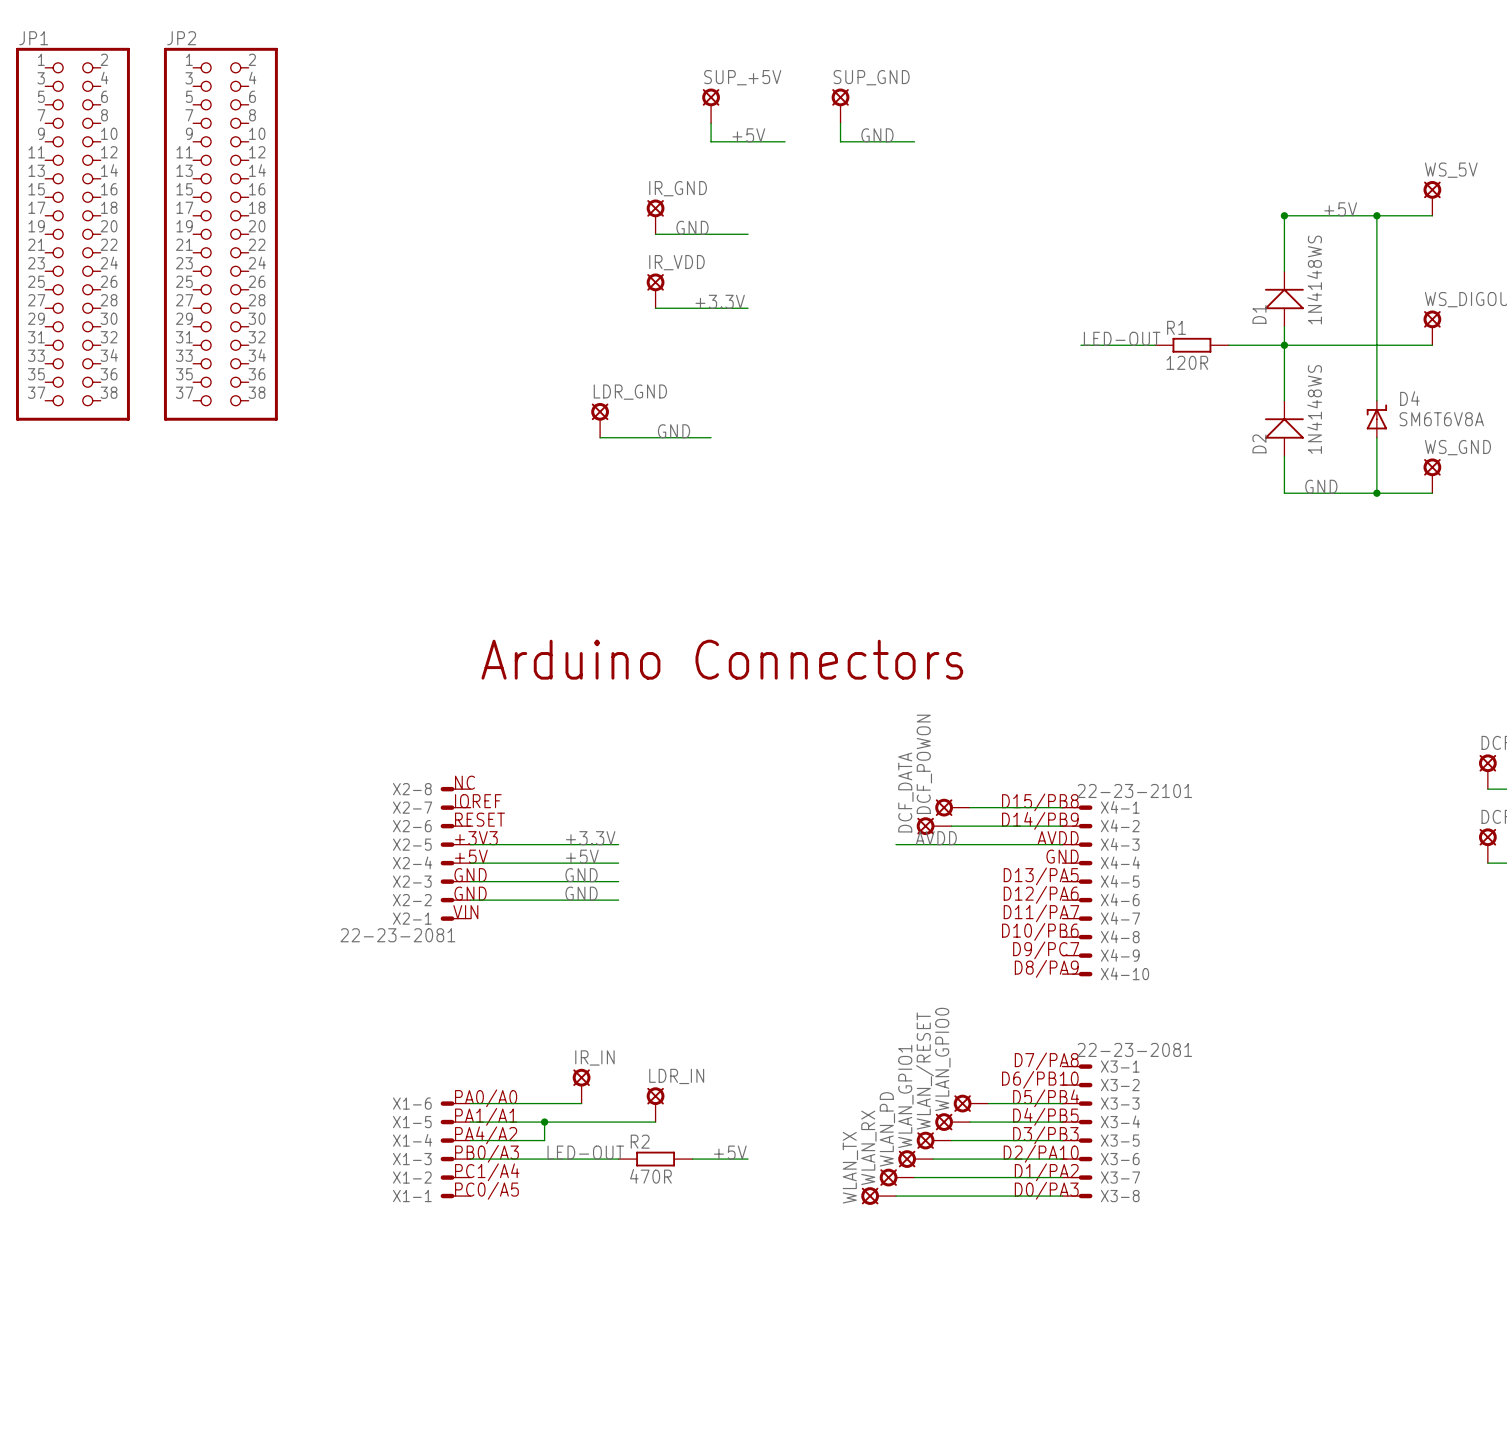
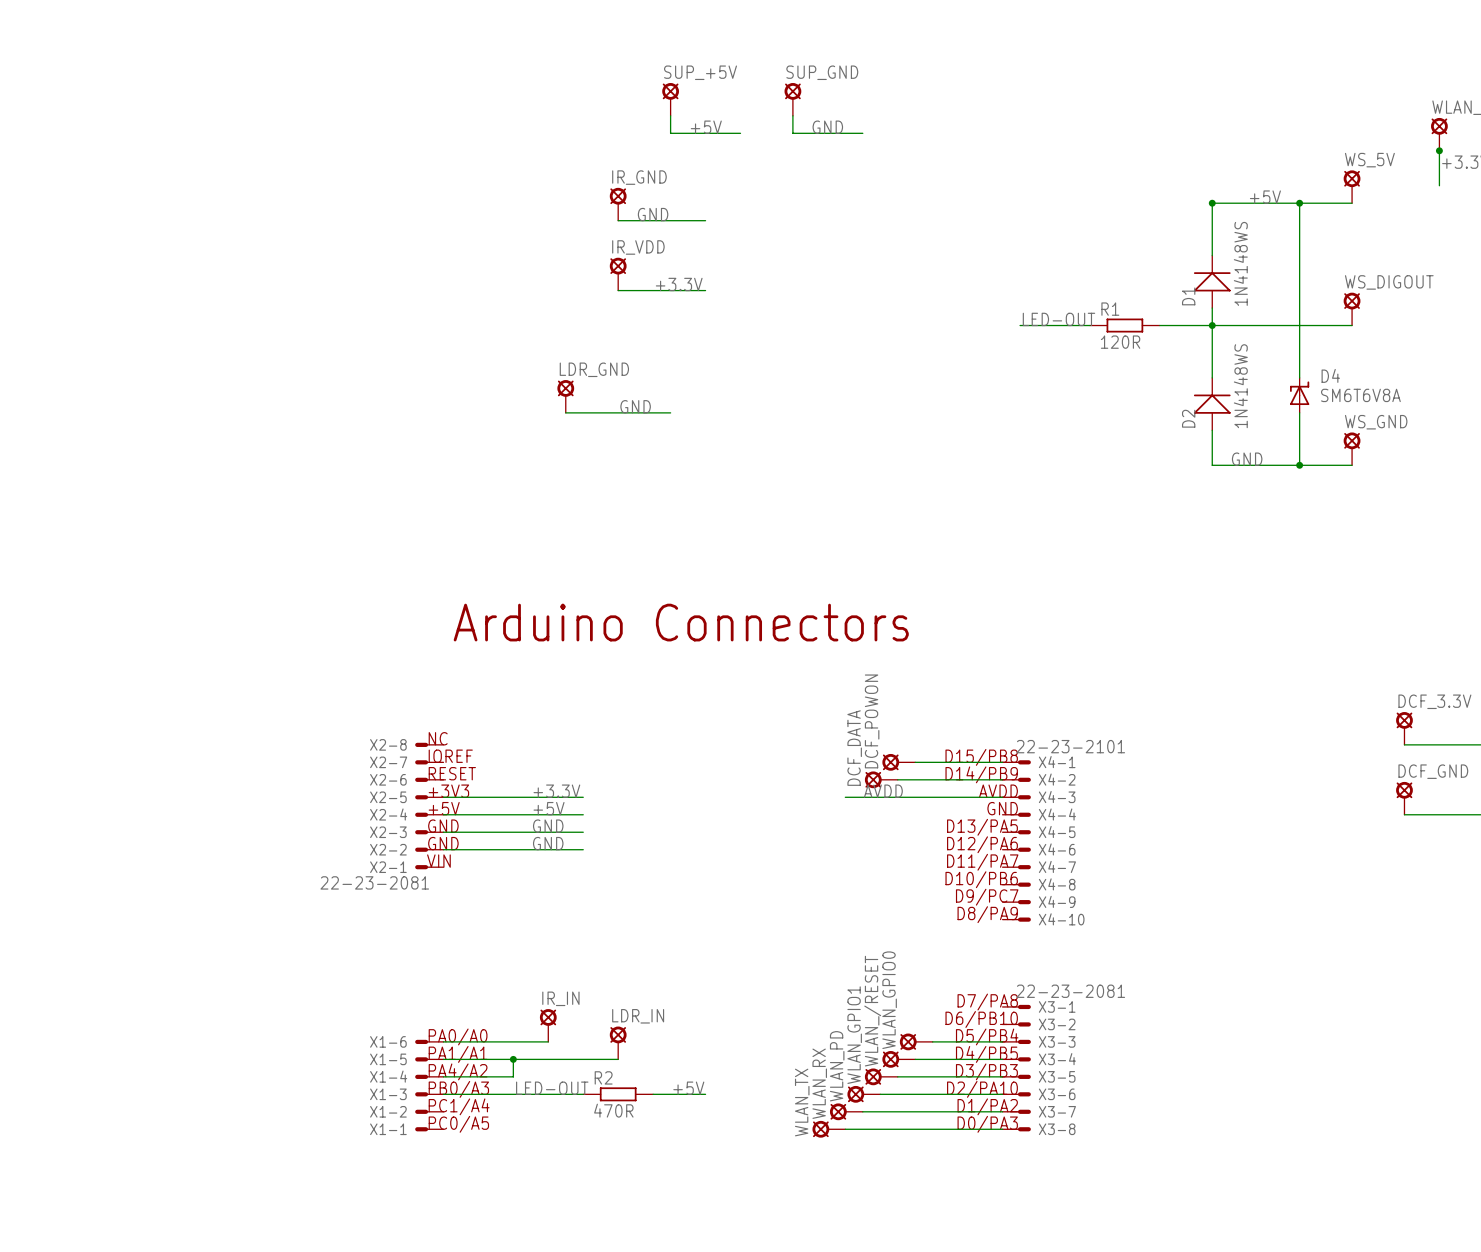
JP1: (72, 234) -> none
JP2: (220, 234) -> none

